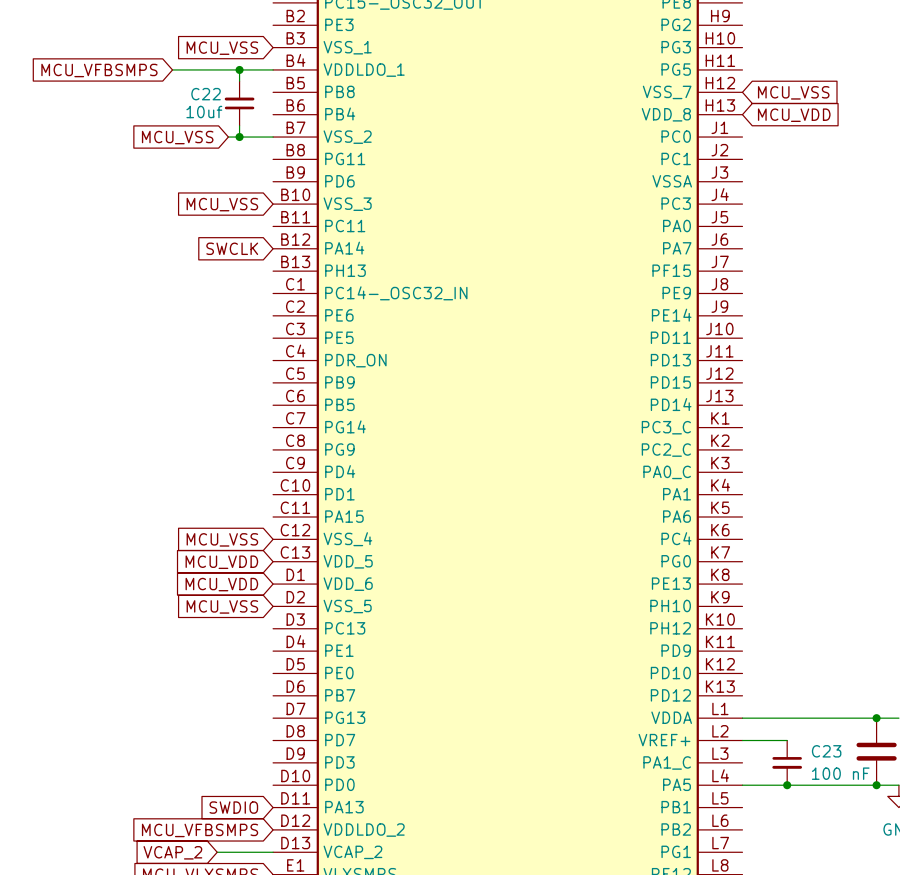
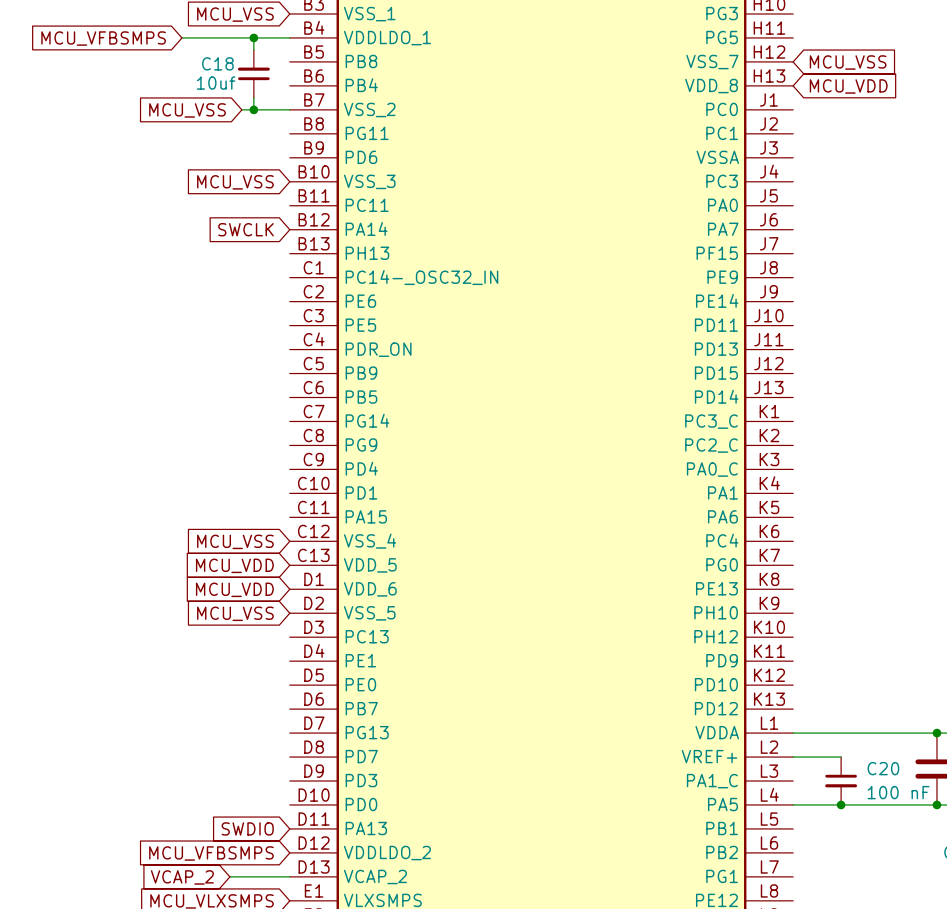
C22 name: C22 (206, 94) -> C18 (217, 63)
C23 name: C23 (826, 751) -> C20 (883, 768)

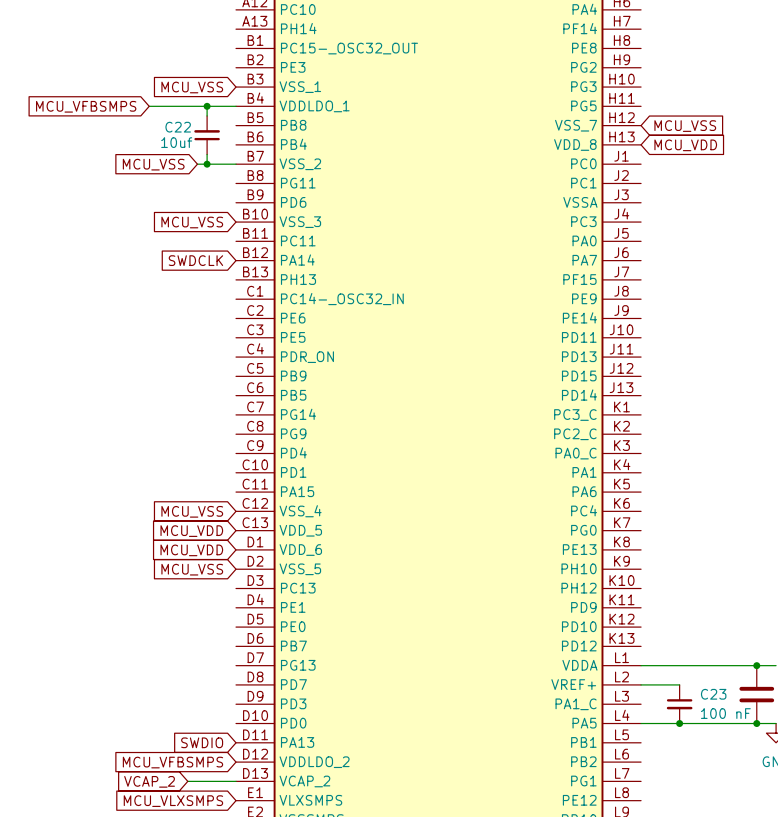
C18 name: C18 (217, 63) -> C22 (178, 127)
global label: SWCLK (245, 229) -> SWDCLK (195, 260)
C20 name: C20 (883, 768) -> C23 (713, 694)

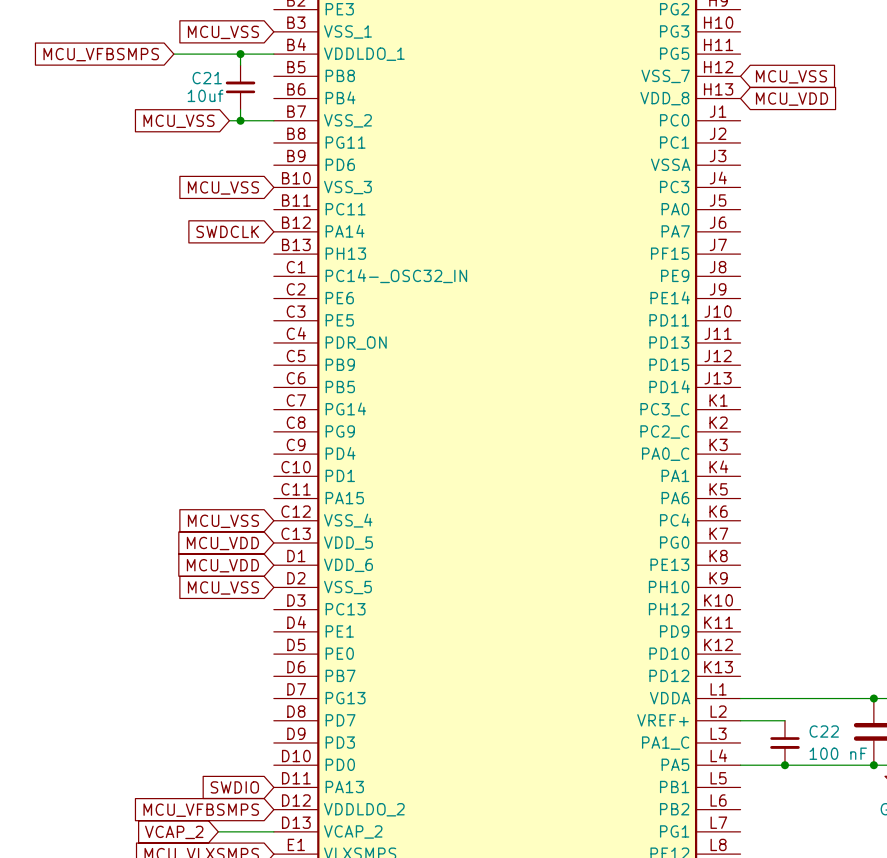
C22 name: C22 (178, 127) -> C21 (207, 78)
C23 name: C23 (713, 694) -> C22 (824, 731)

